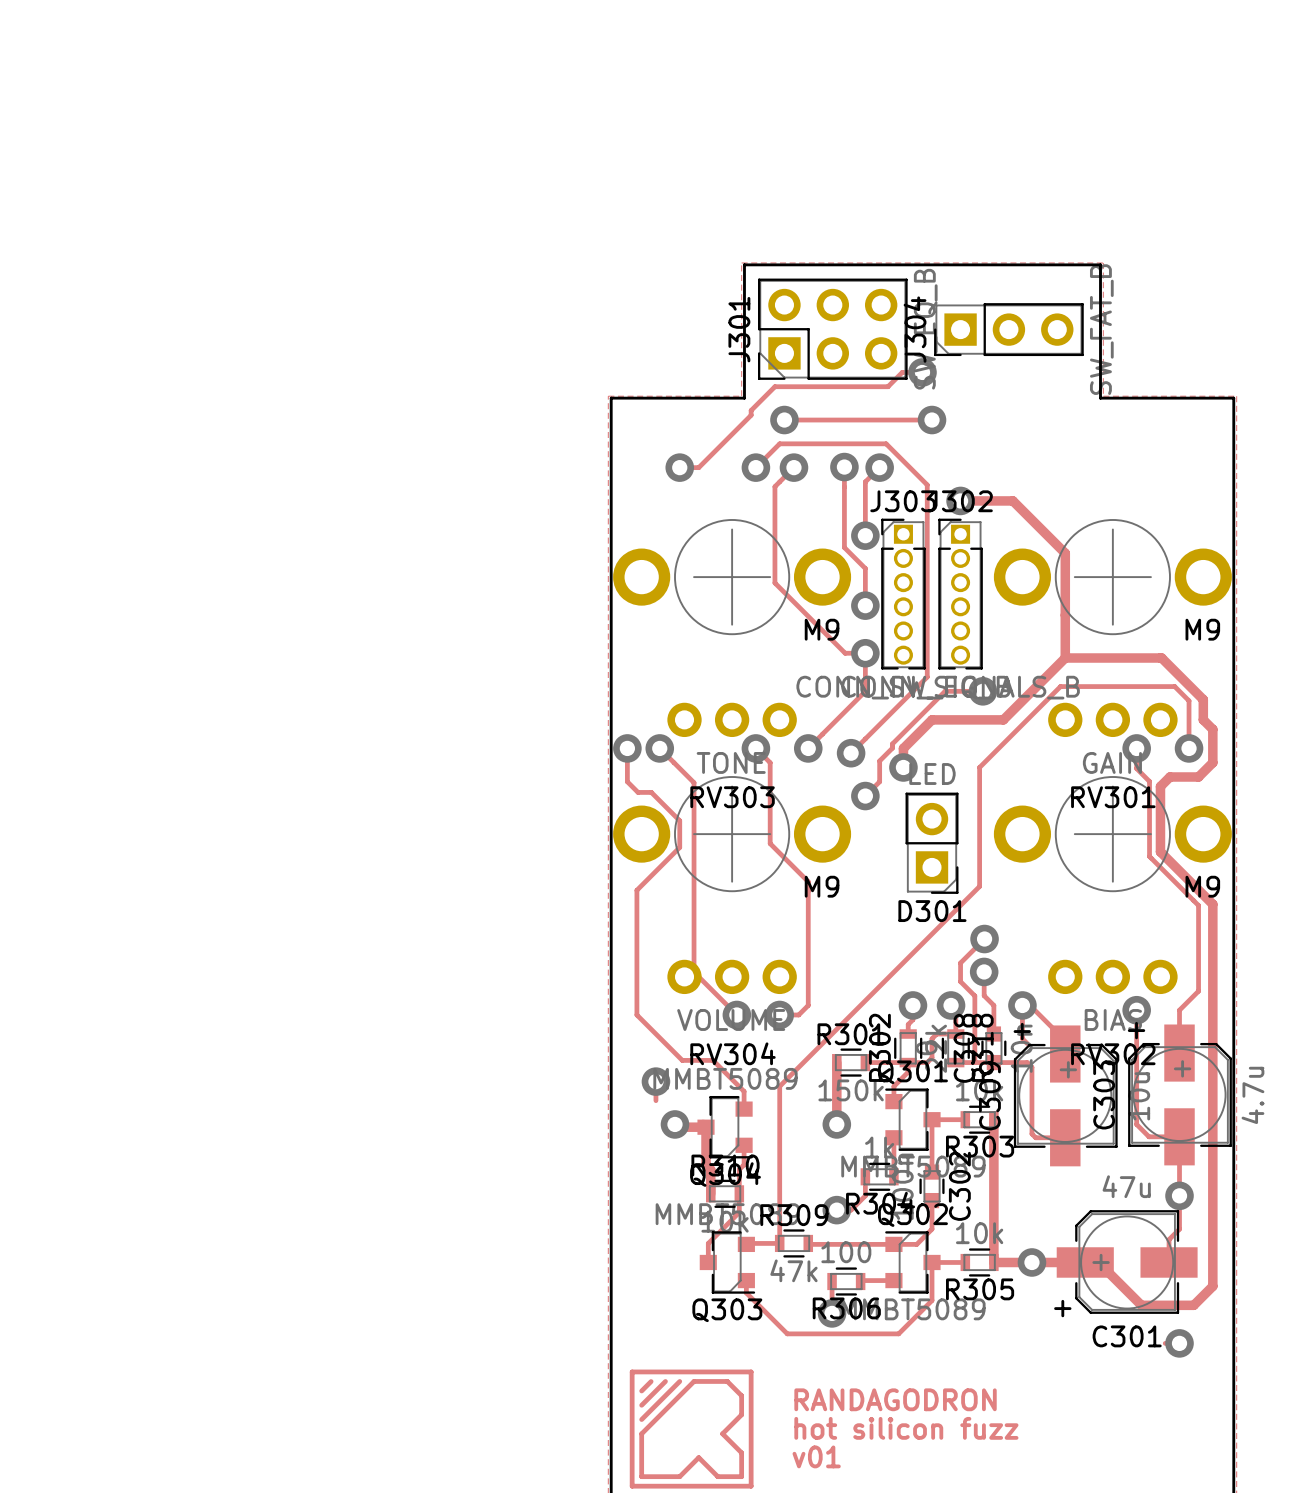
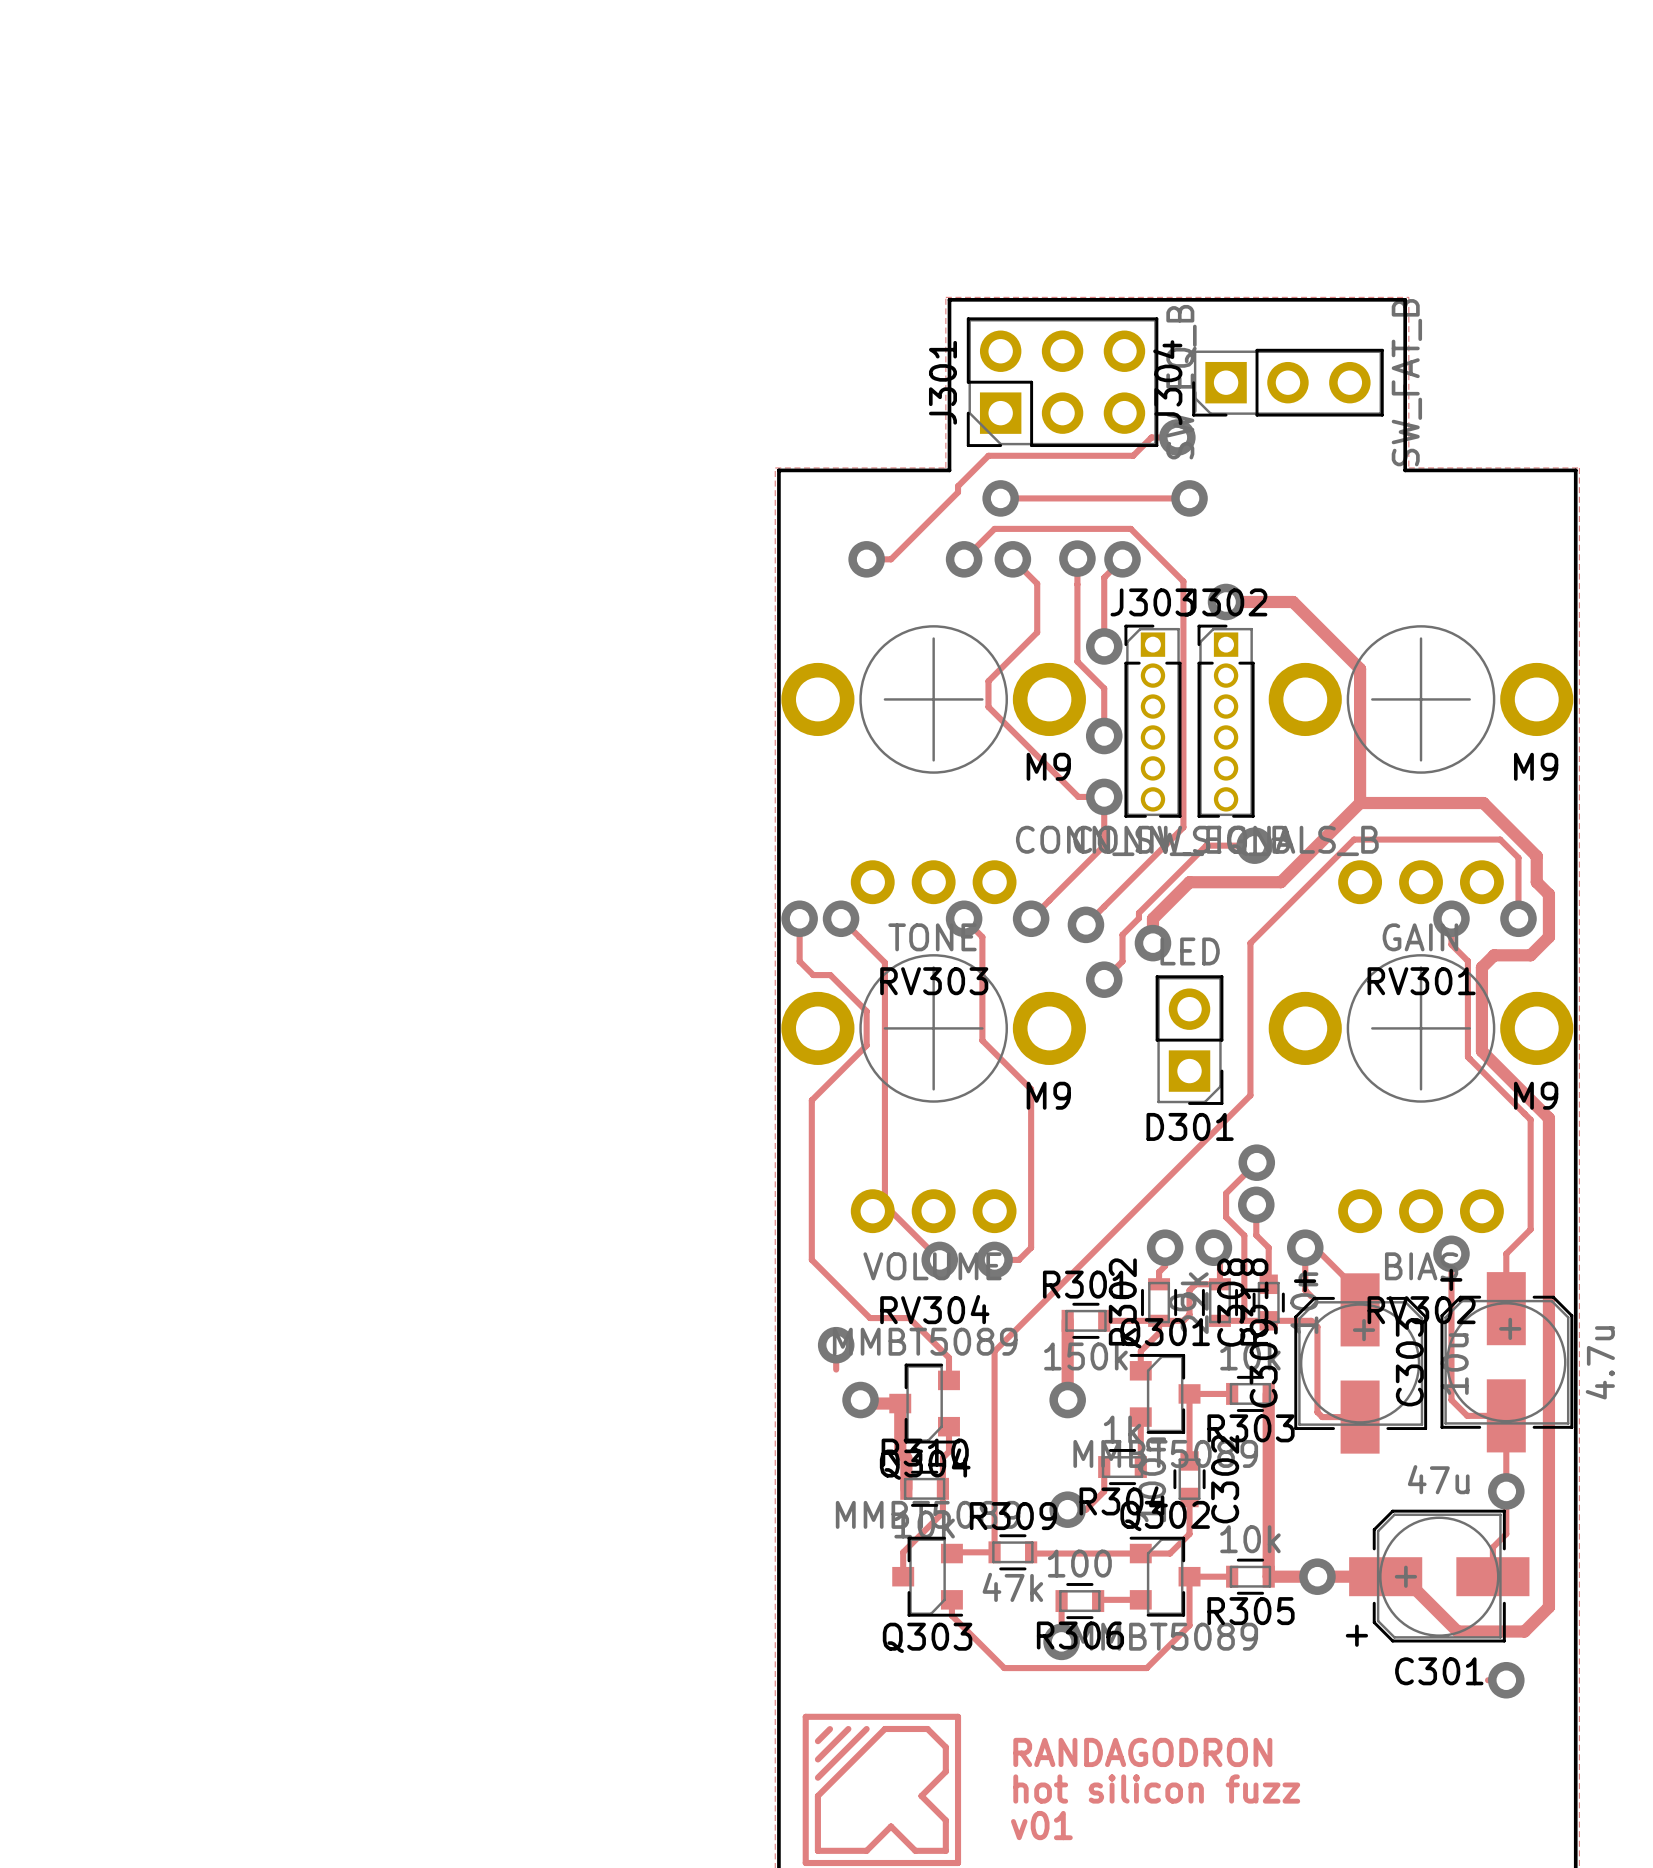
track: (793, 467) (774, 486) (774, 562) -> (1012, 559) (1037, 583) (1037, 632) (988, 681)

